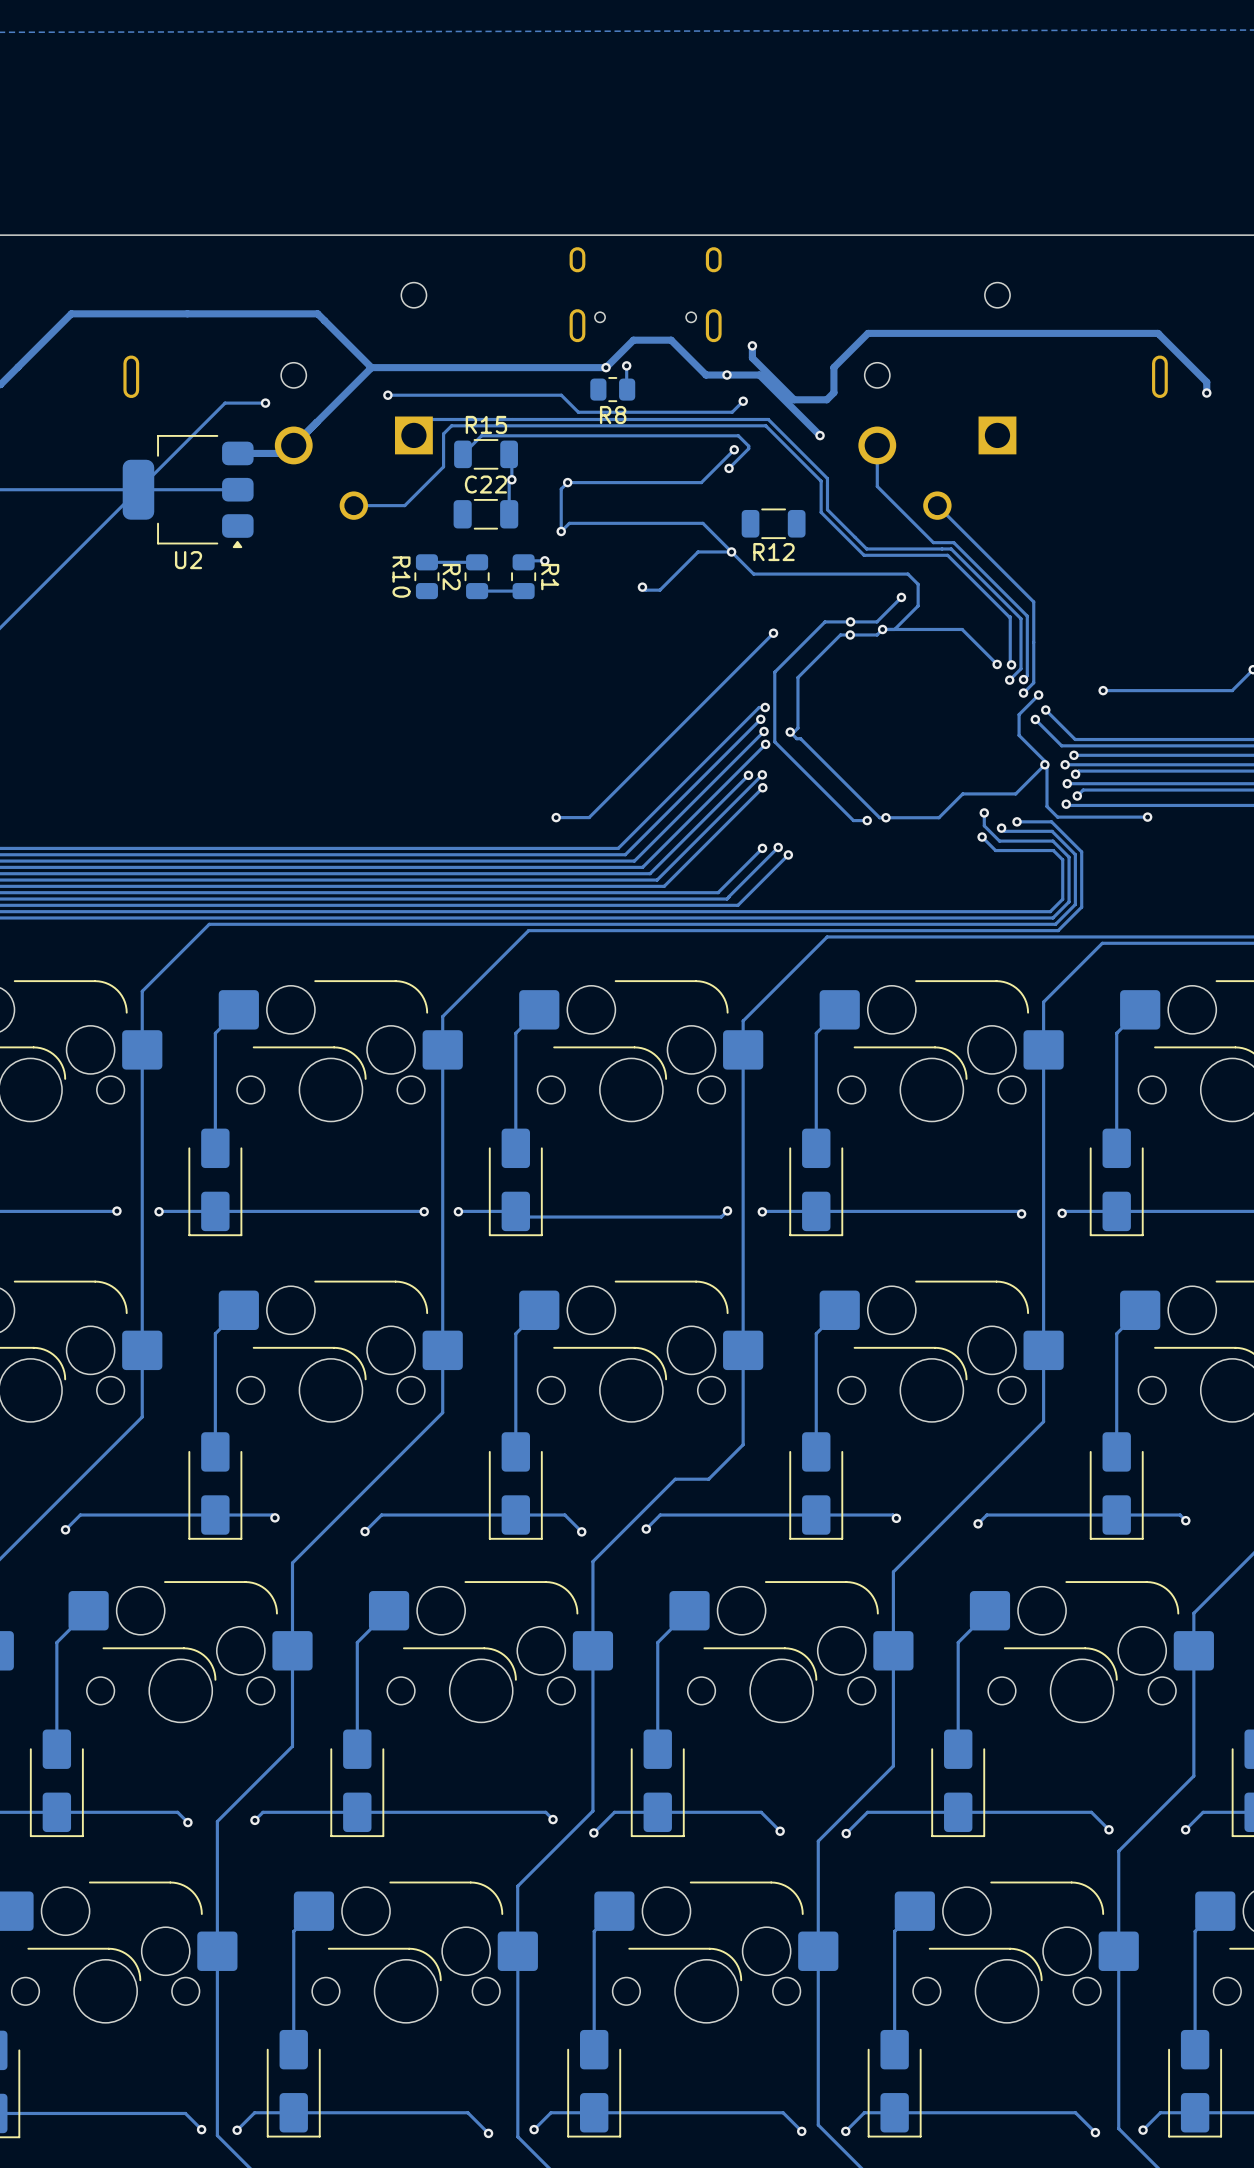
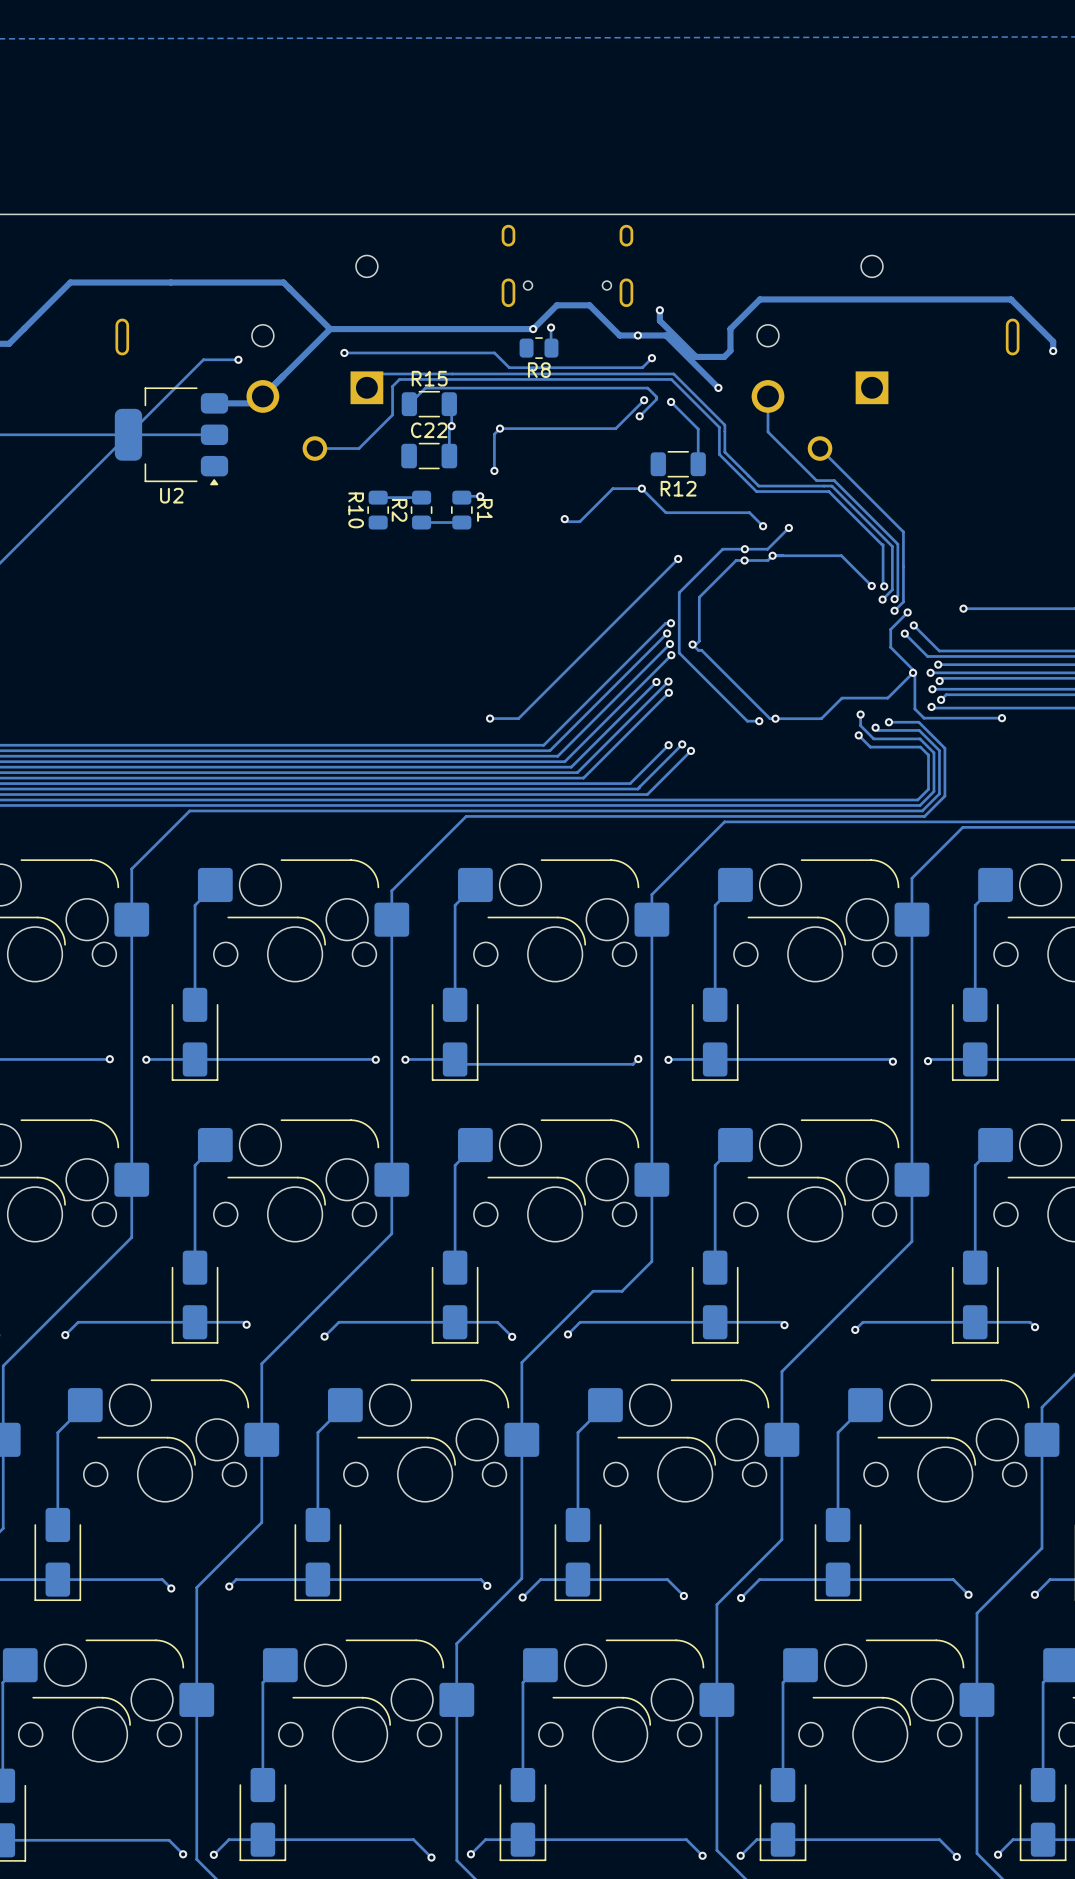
track: none -> (671, 401) (698, 429) (698, 464)
via: none -> (671, 401)
track: (561, 531) (569, 523) (702, 523) (731, 551) -> none
track: (753, 574) (907, 574) (918, 584) (918, 605) (894, 629) -> (660, 507) (665, 512) (749, 512) (763, 526)
via: none -> (763, 526)

